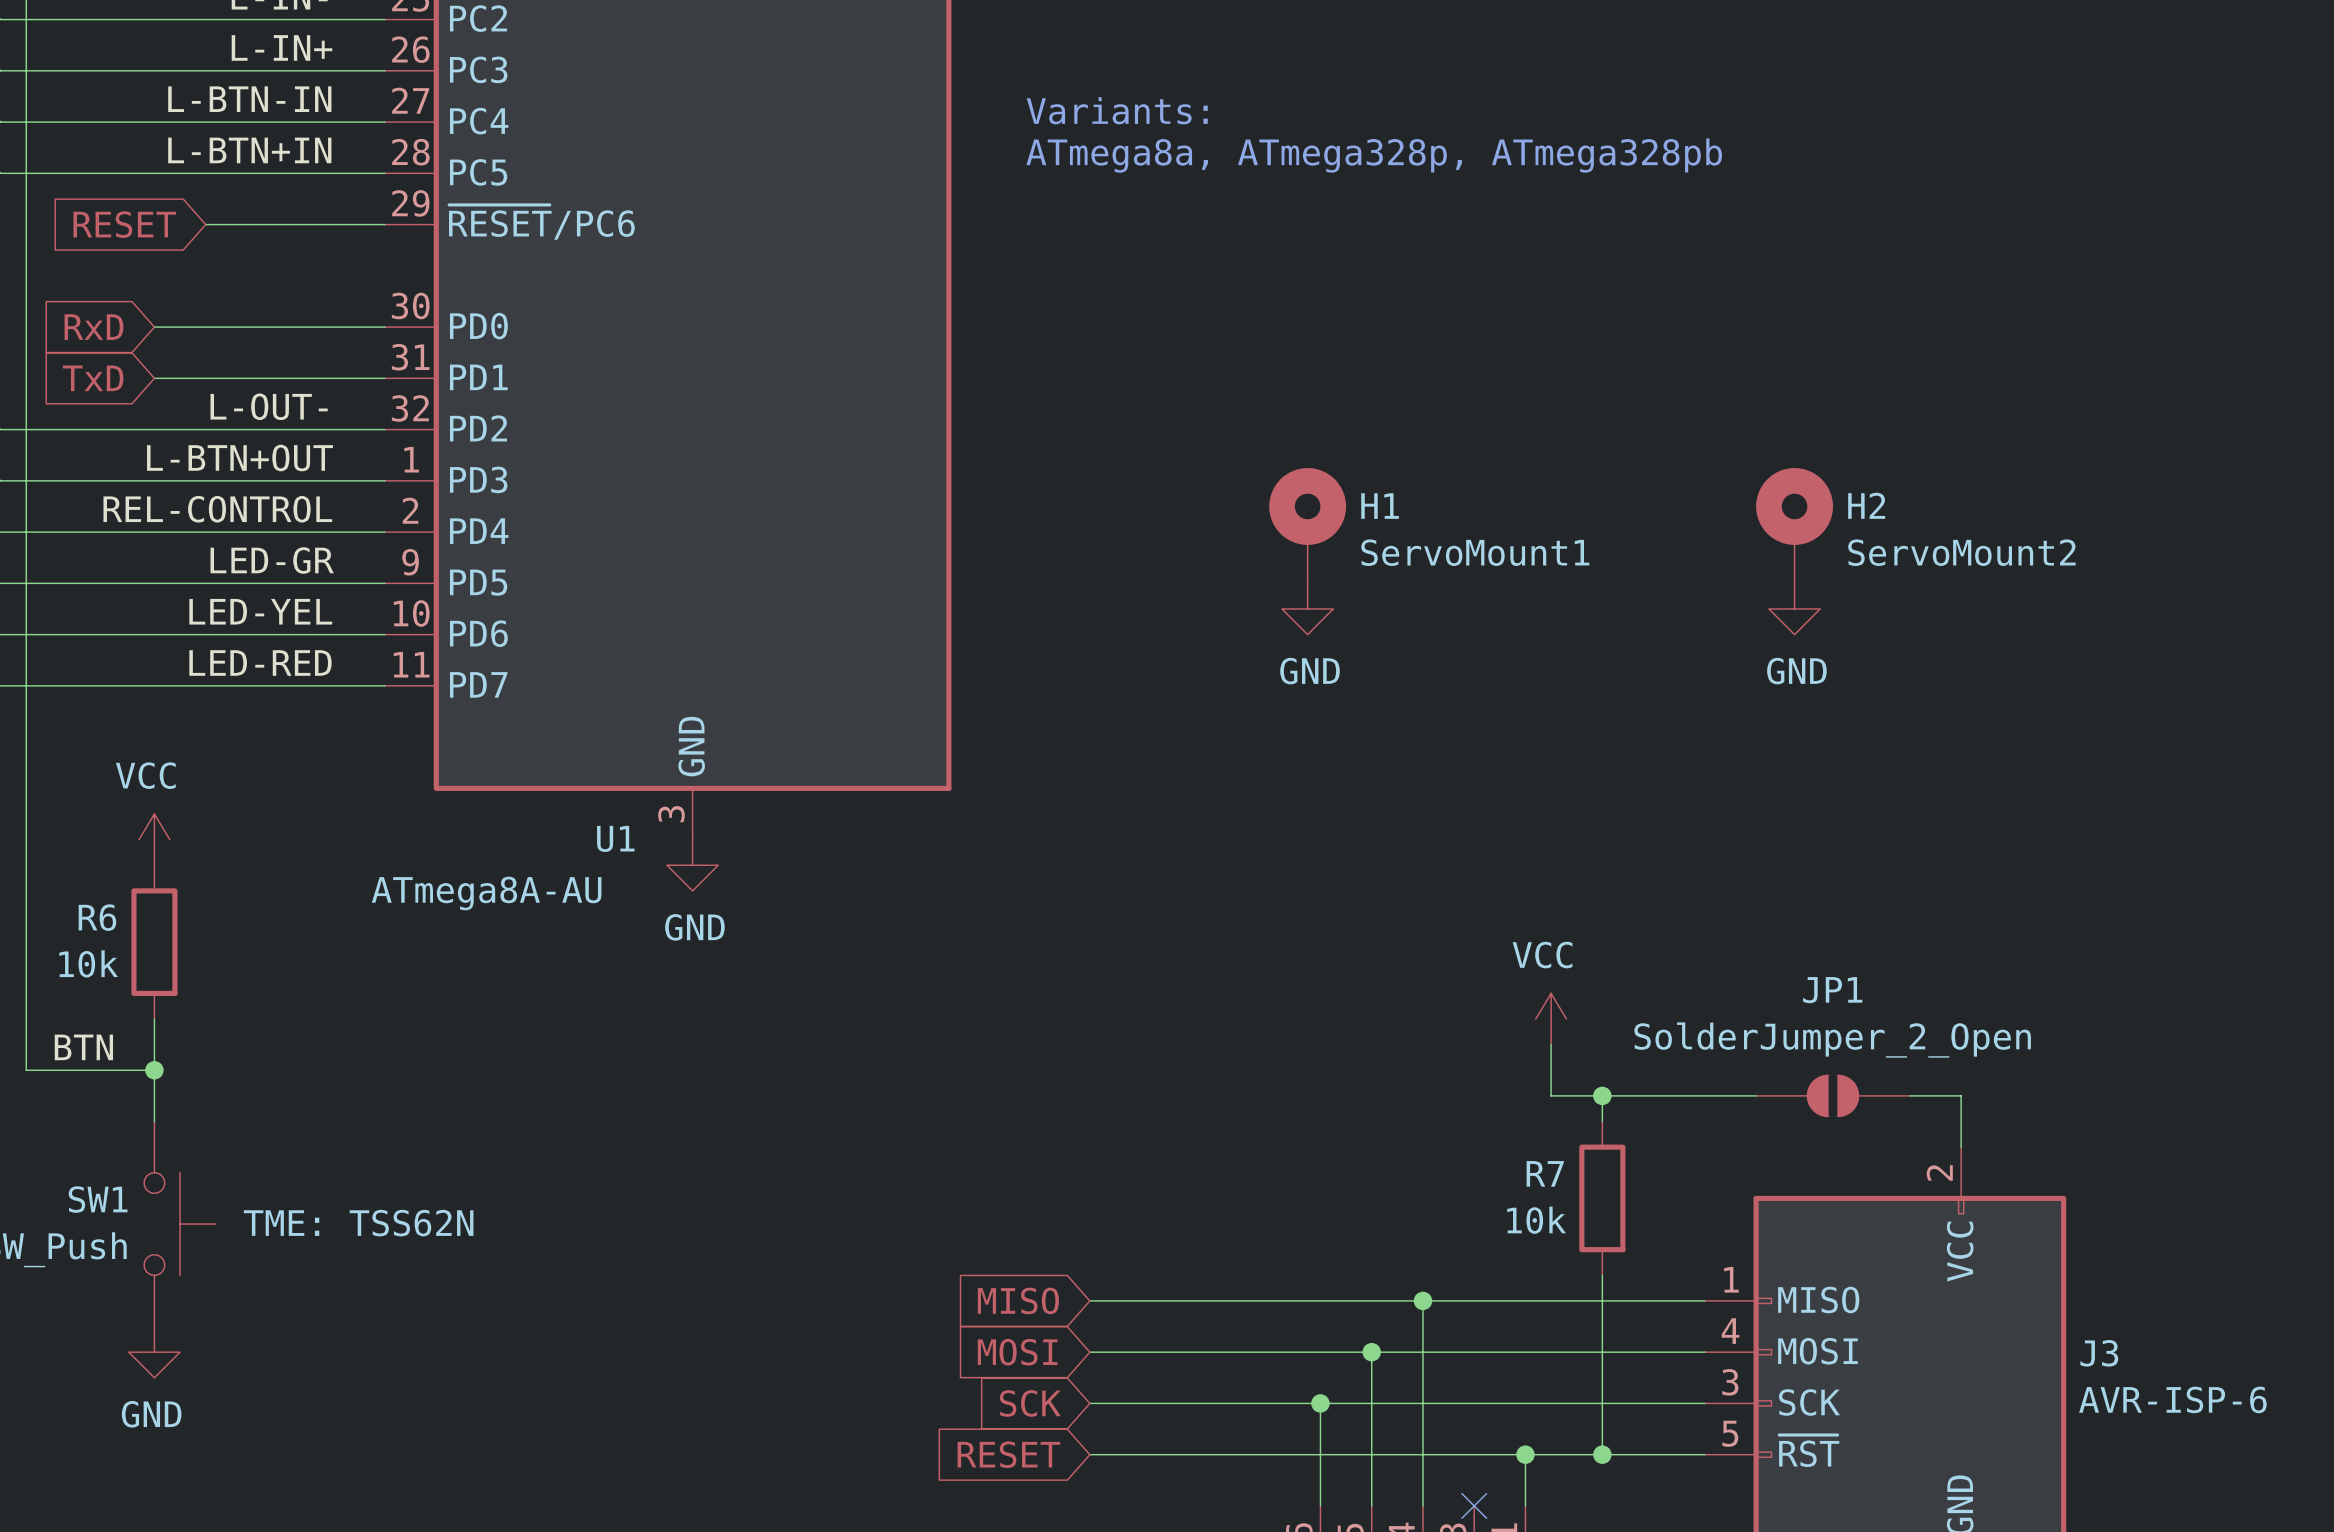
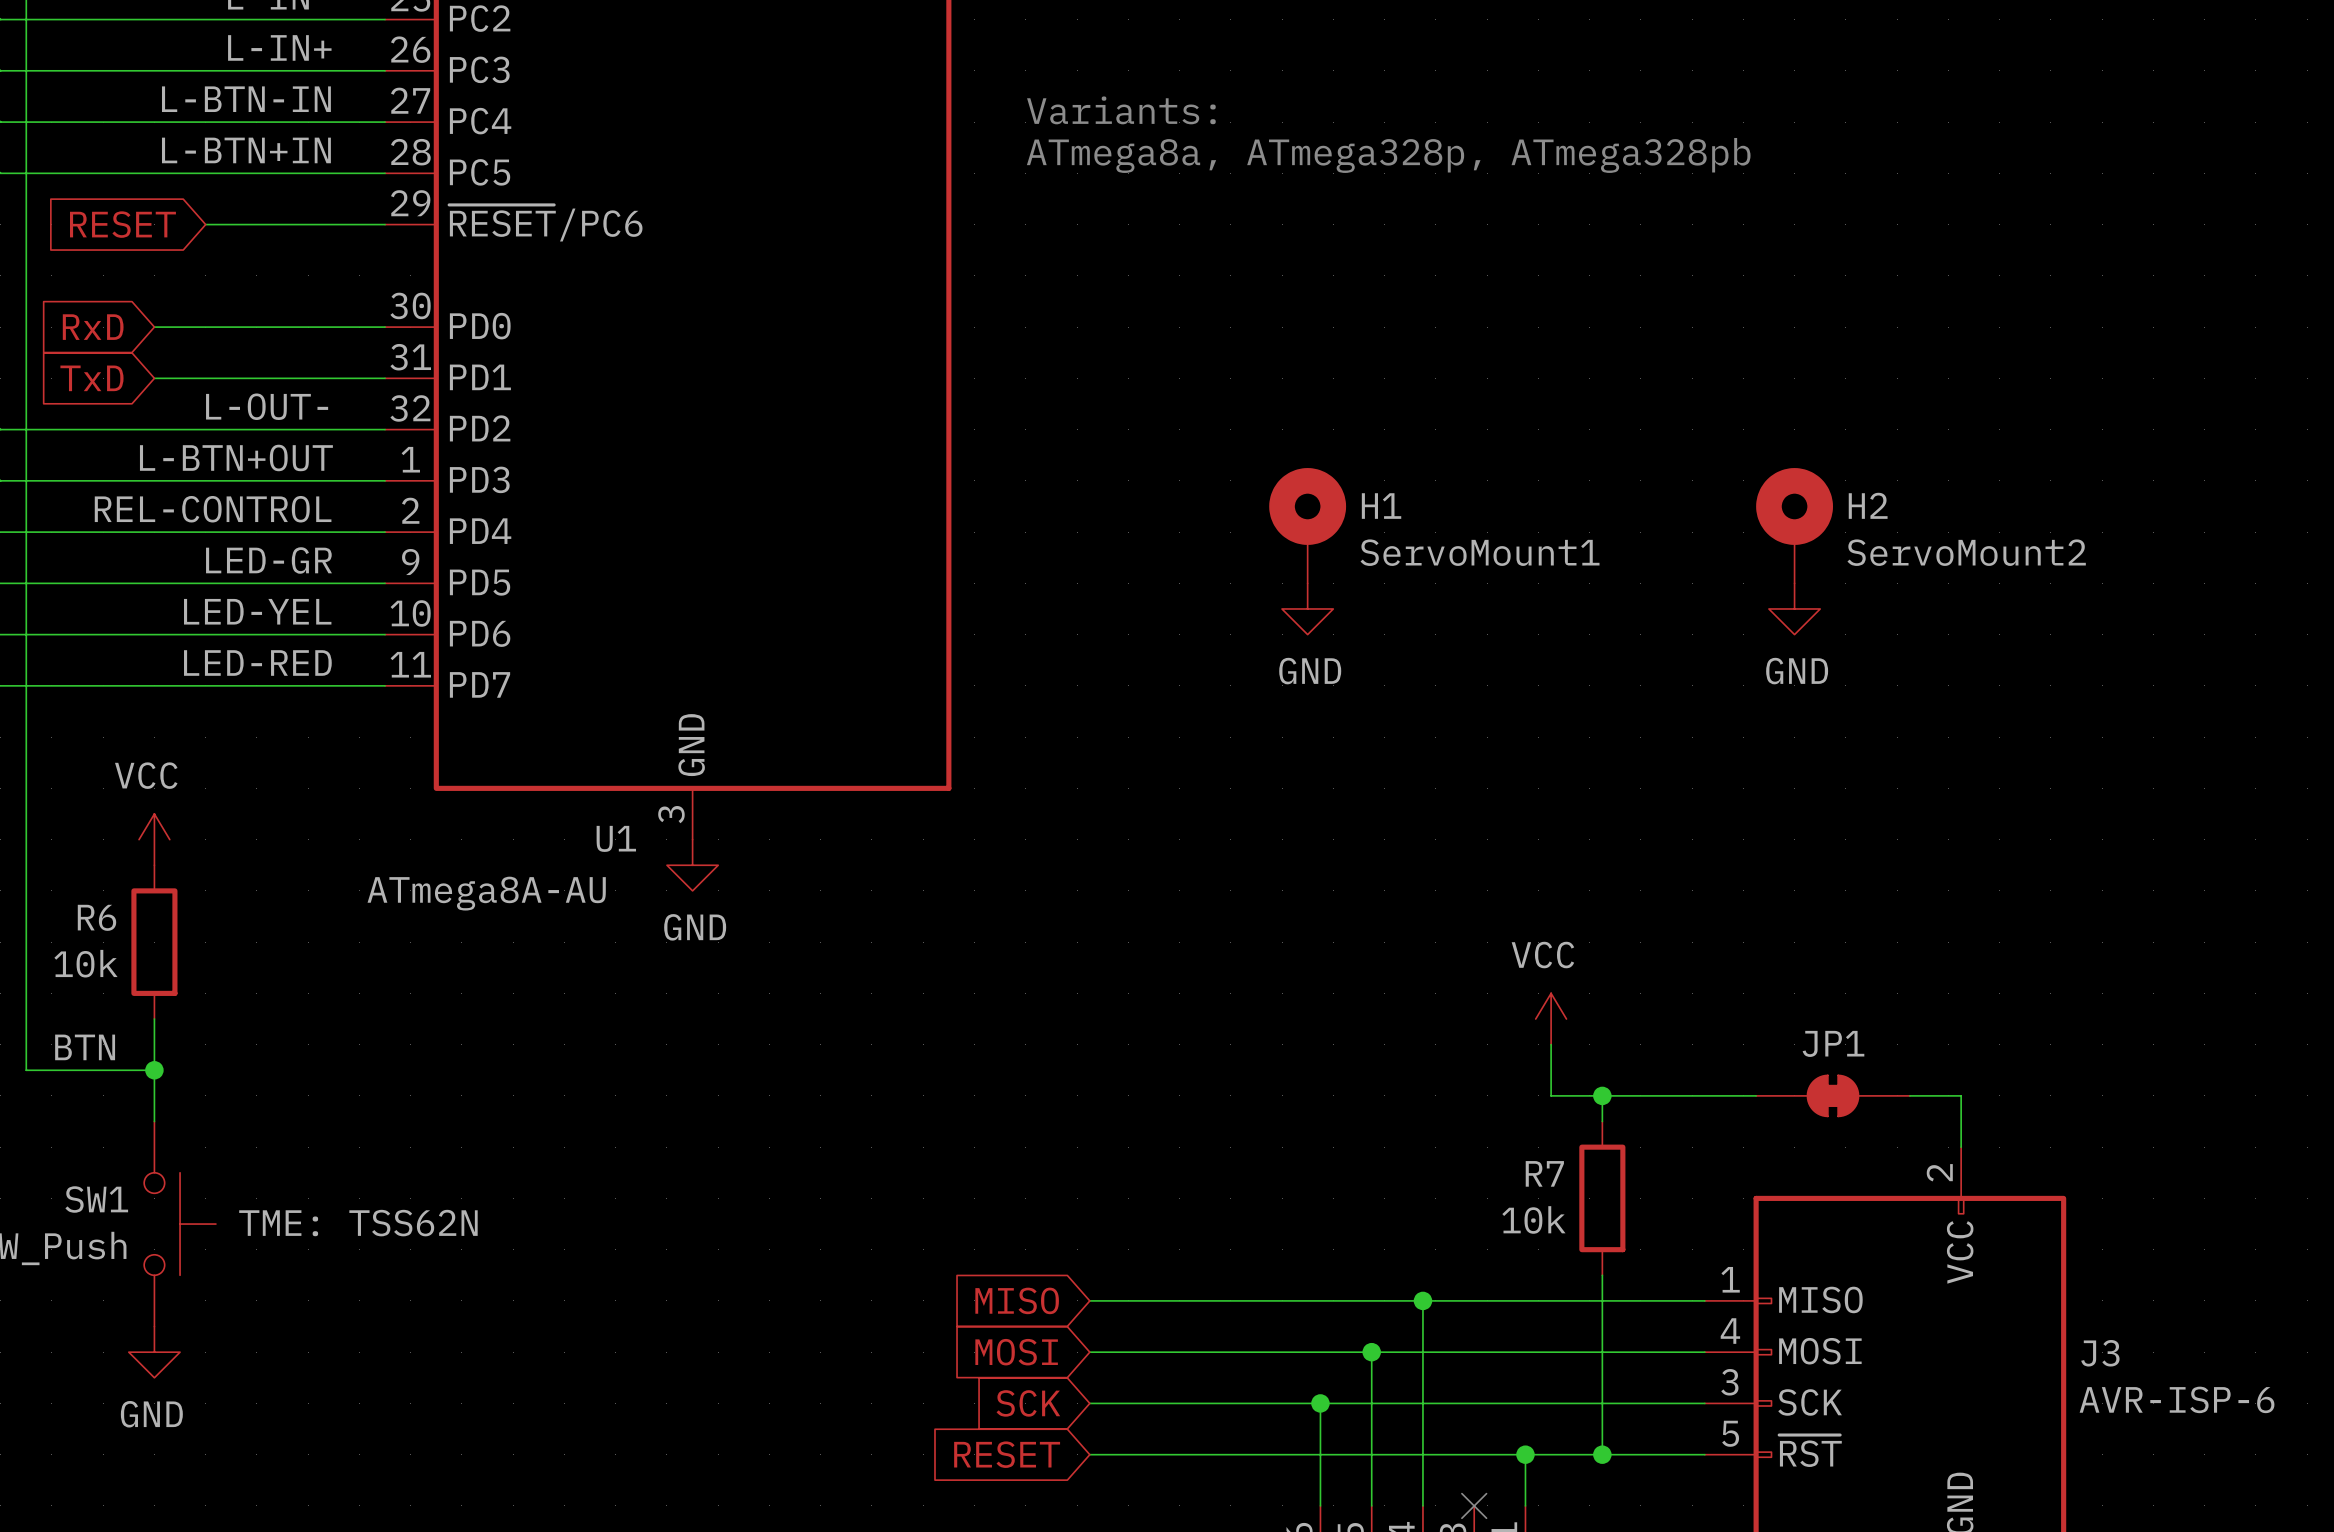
JP1 name position: JP1 (1832, 990) -> JP1 (1833, 1043)
JP1 value: SolderJumper_2_Open (1832, 1040) -> none
JP1 symbol: [1756, 1075, 1910, 1117] -> [1756, 1075, 1910, 1117]

